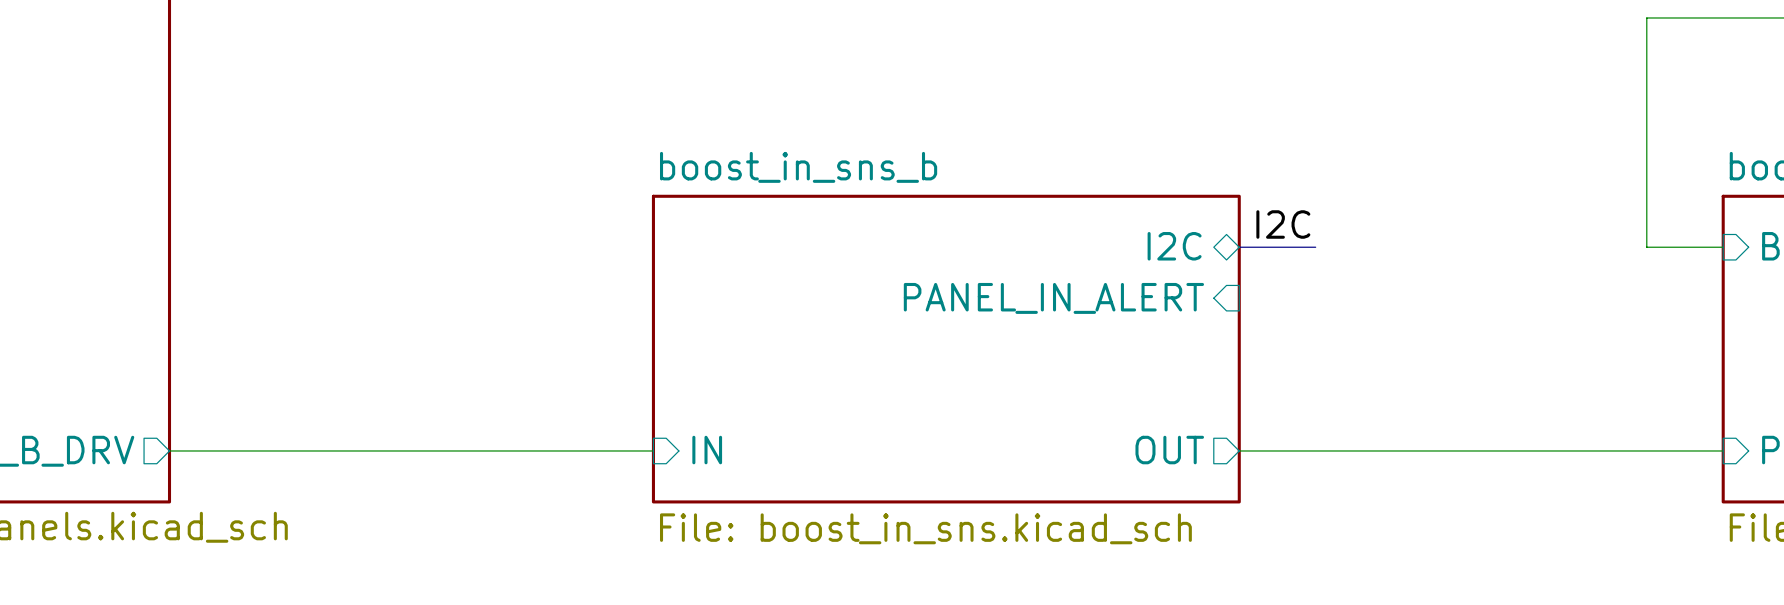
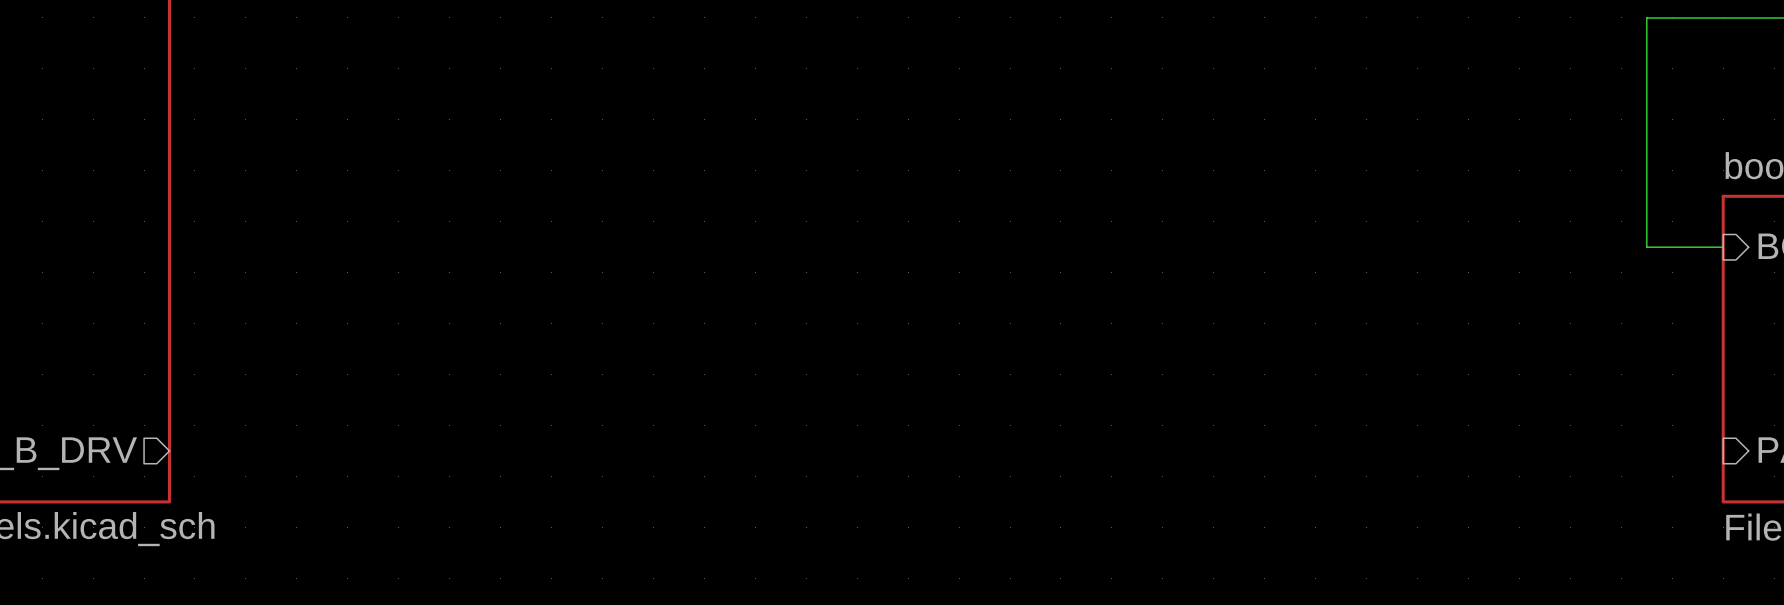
label: I2C (1283, 224) -> none
sheet pin: I2C (1174, 246) -> none
bus: (1239, 247) (1315, 247) -> none
sheet pin: PANEL_IN_ALERT (1053, 298) -> none
sheet boost_in_sns_b: File: boost_in_sns.kicad_sch (946, 349) -> none
wire: (169, 450) (653, 450) -> none
sheet pin: IN (707, 450) -> none
sheet pin: OUT (1169, 450) -> none
wire: (1239, 450) (1723, 450) -> none

